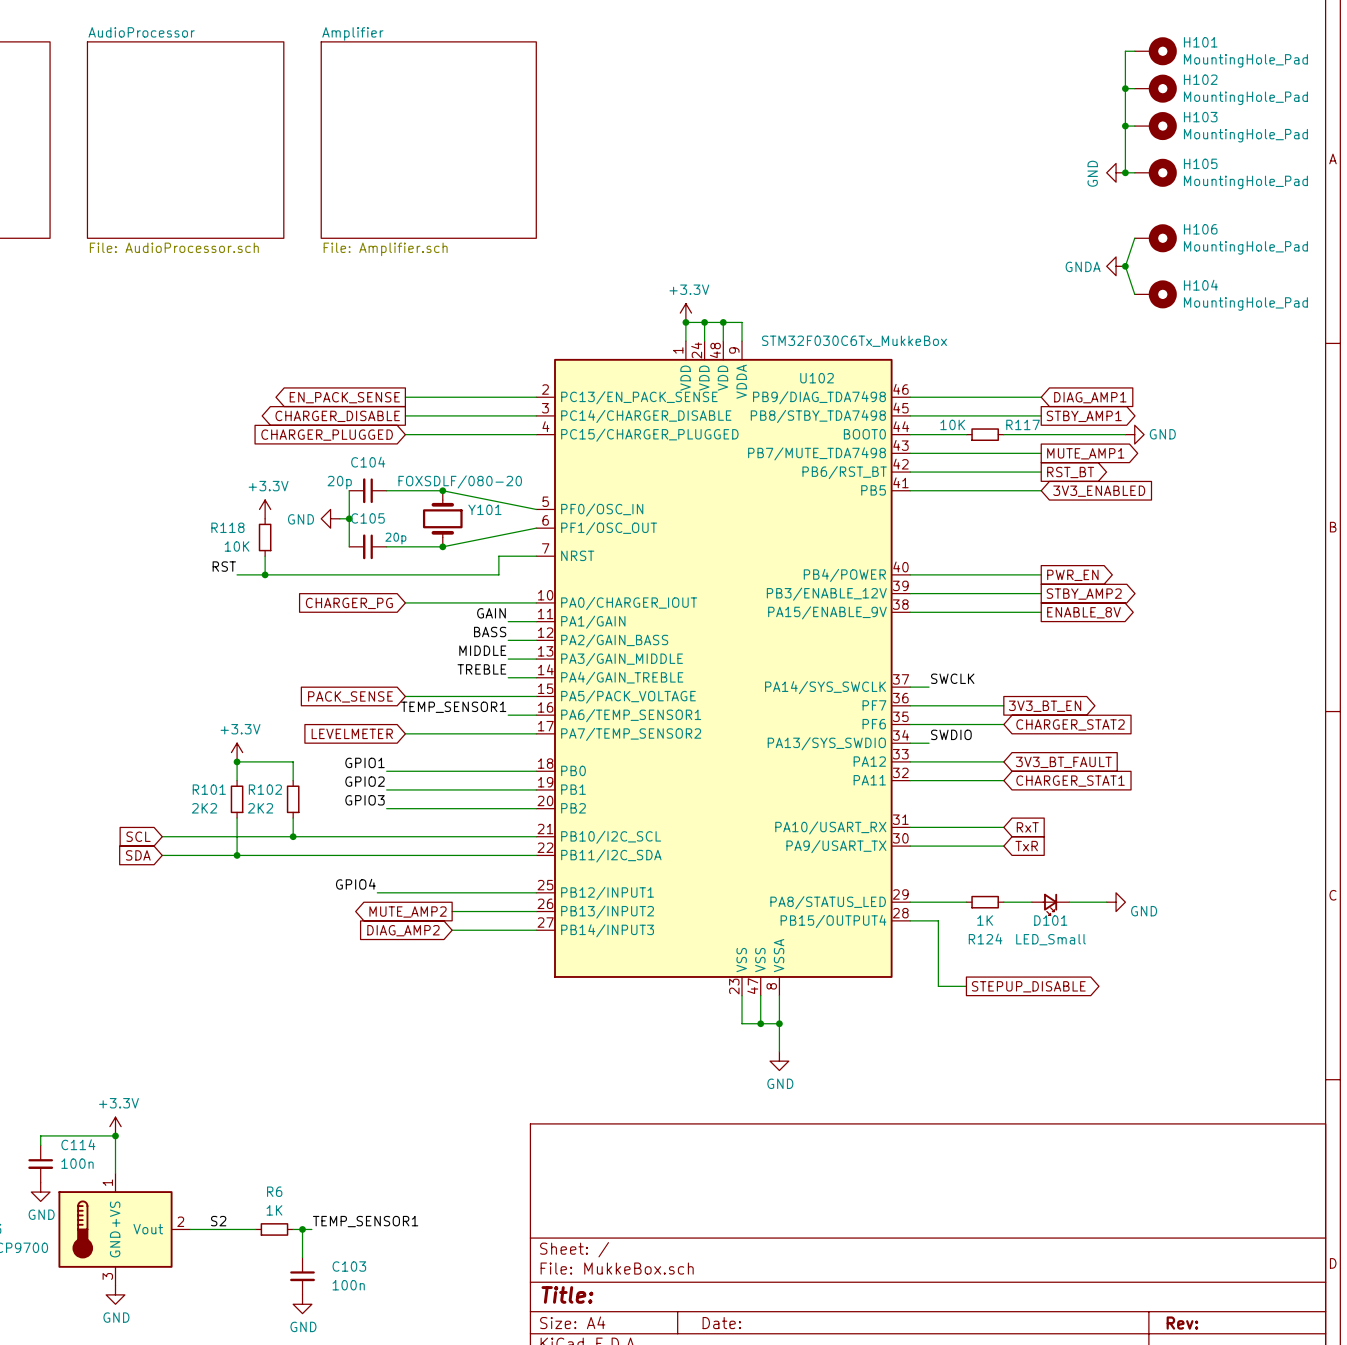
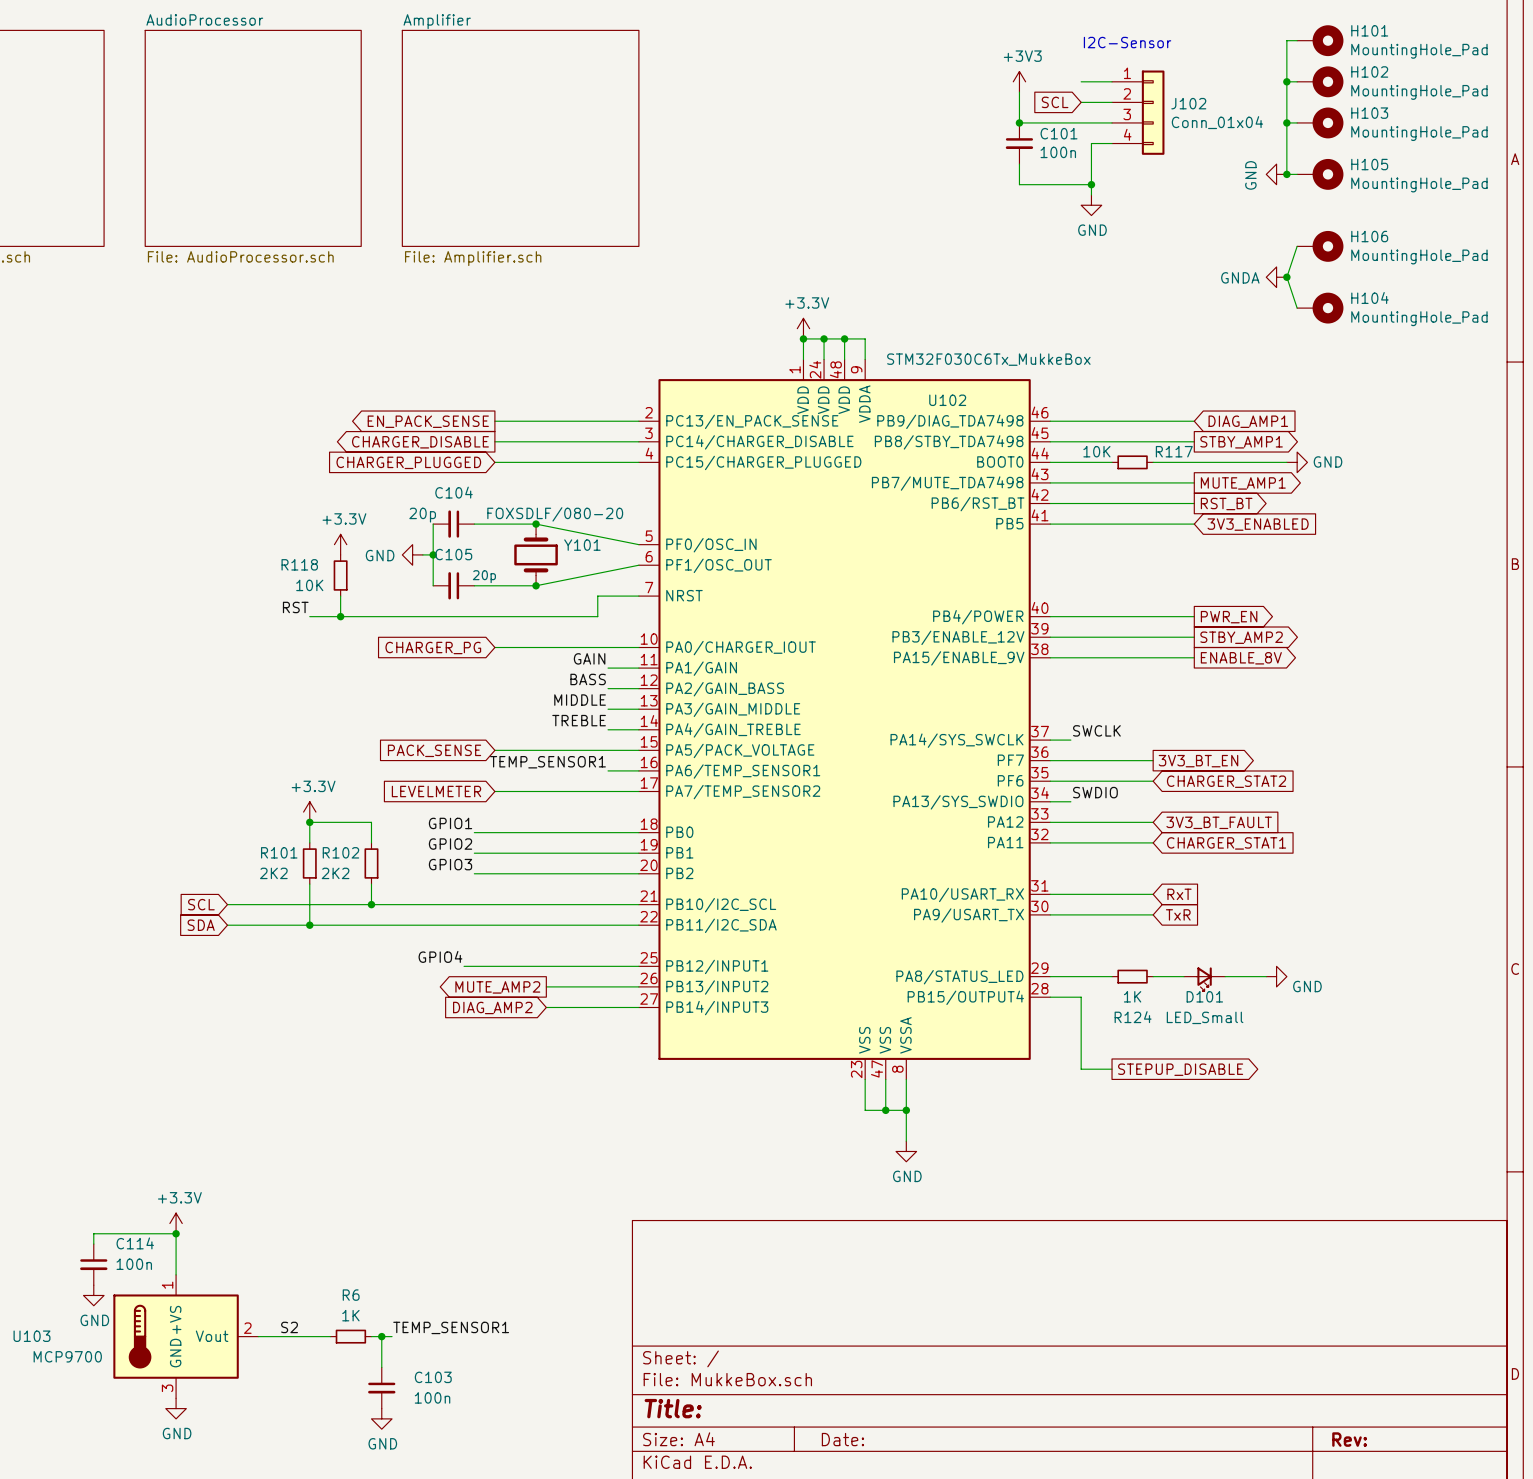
text: none -> I2C-Sensor (1127, 42)
power symbol: none -> +3V3 (1019, 81)
wire: none -> (1081, 81) (1112, 81)
wire: none -> (1019, 92) (1019, 122) (1112, 122)
global label: none -> SCL (1055, 102)
wire: none -> (1081, 102) (1112, 102)
J102: none -> Conn_01x04 (1138, 112)
junction: none -> (1019, 122)
C101: none -> 100n (1019, 143)
wire: none -> (1112, 143) (1091, 143) (1091, 194)
wire: none -> (1019, 164) (1019, 184) (1091, 184)
junction: none -> (1091, 184)
power symbol: none -> GND (1091, 205)

